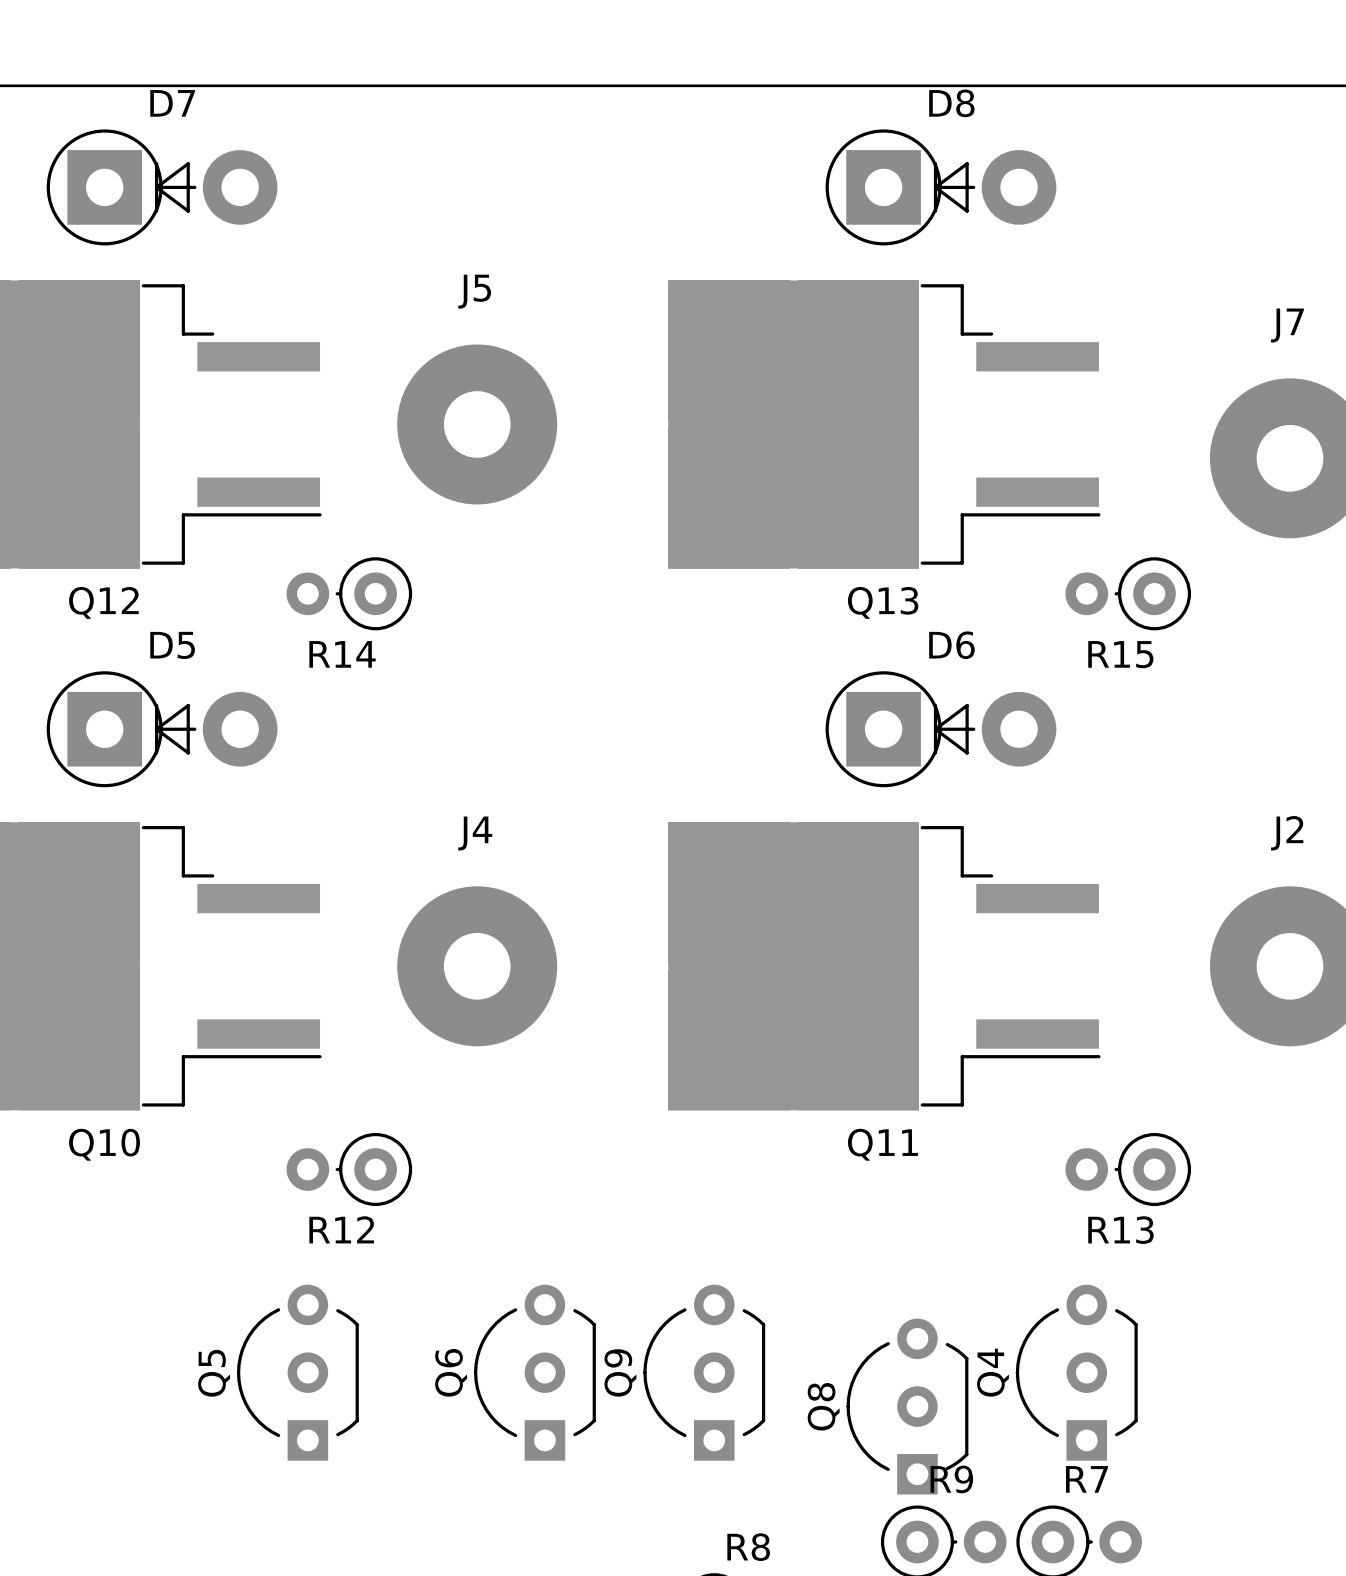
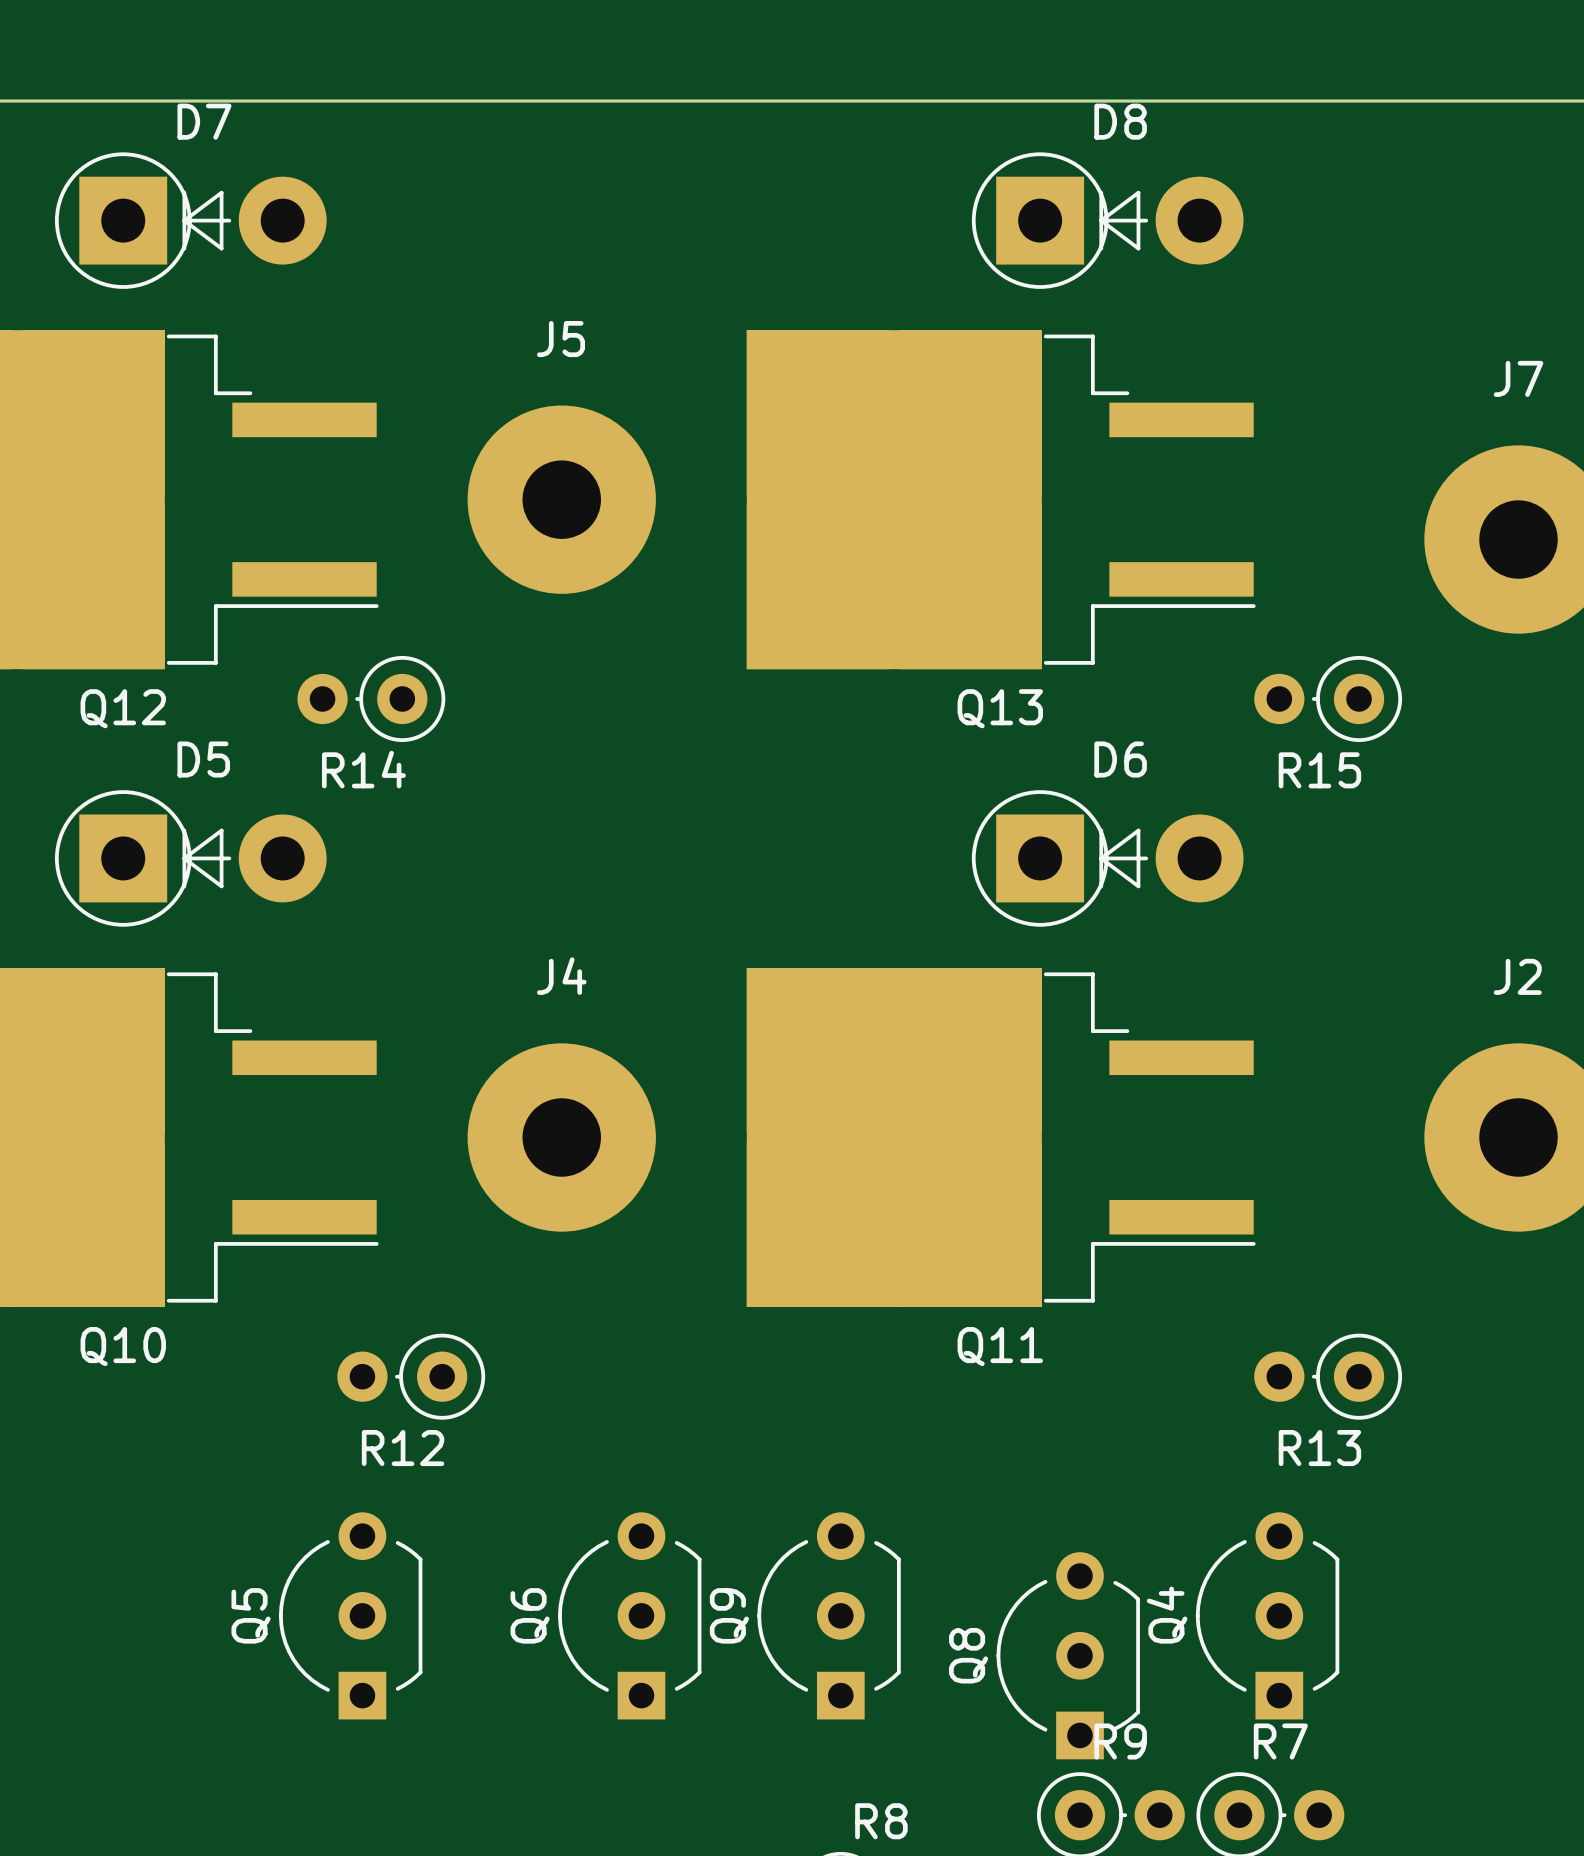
Q13 position: (884, 424) -> (1001, 499)
R14 position: (349, 593) -> (371, 698)
Q11 position: (884, 966) -> (1001, 1137)

